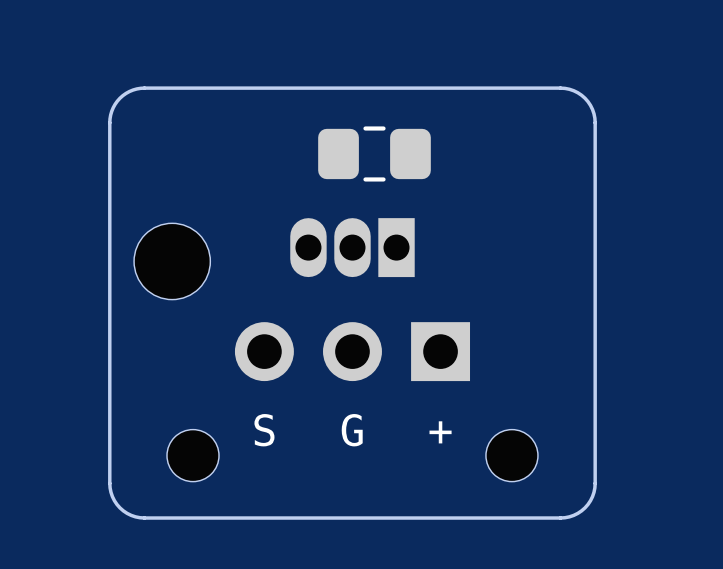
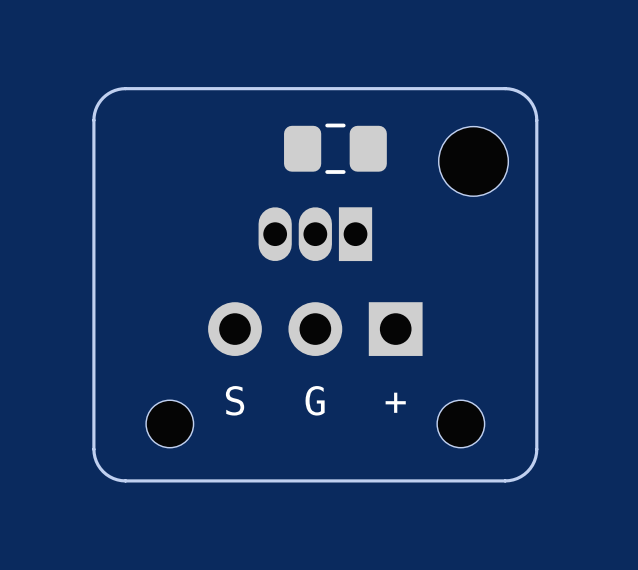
part position: (172, 261) -> (473, 161)

